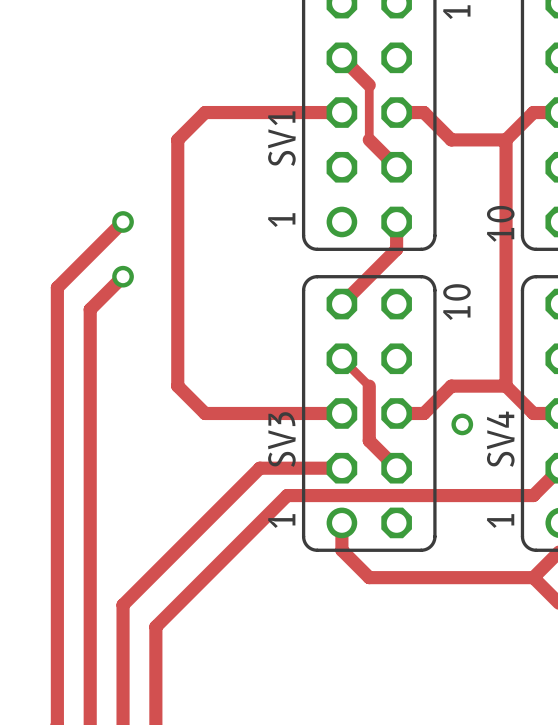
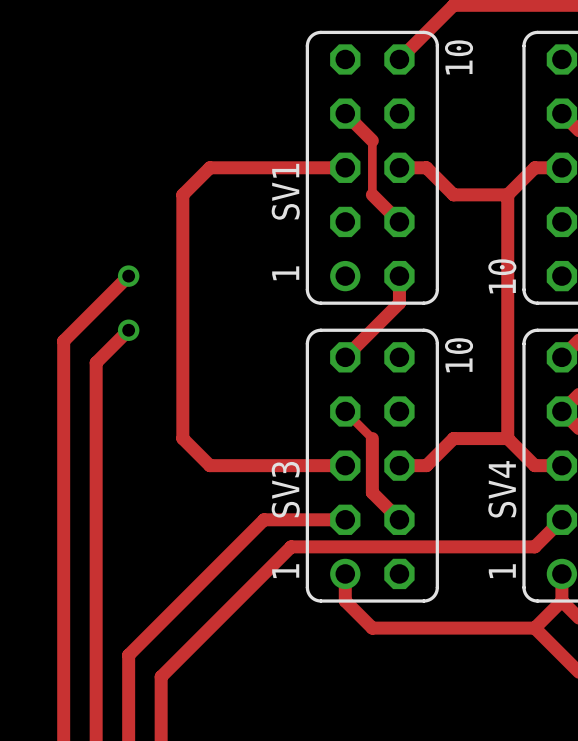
via: (462, 424) -> none

